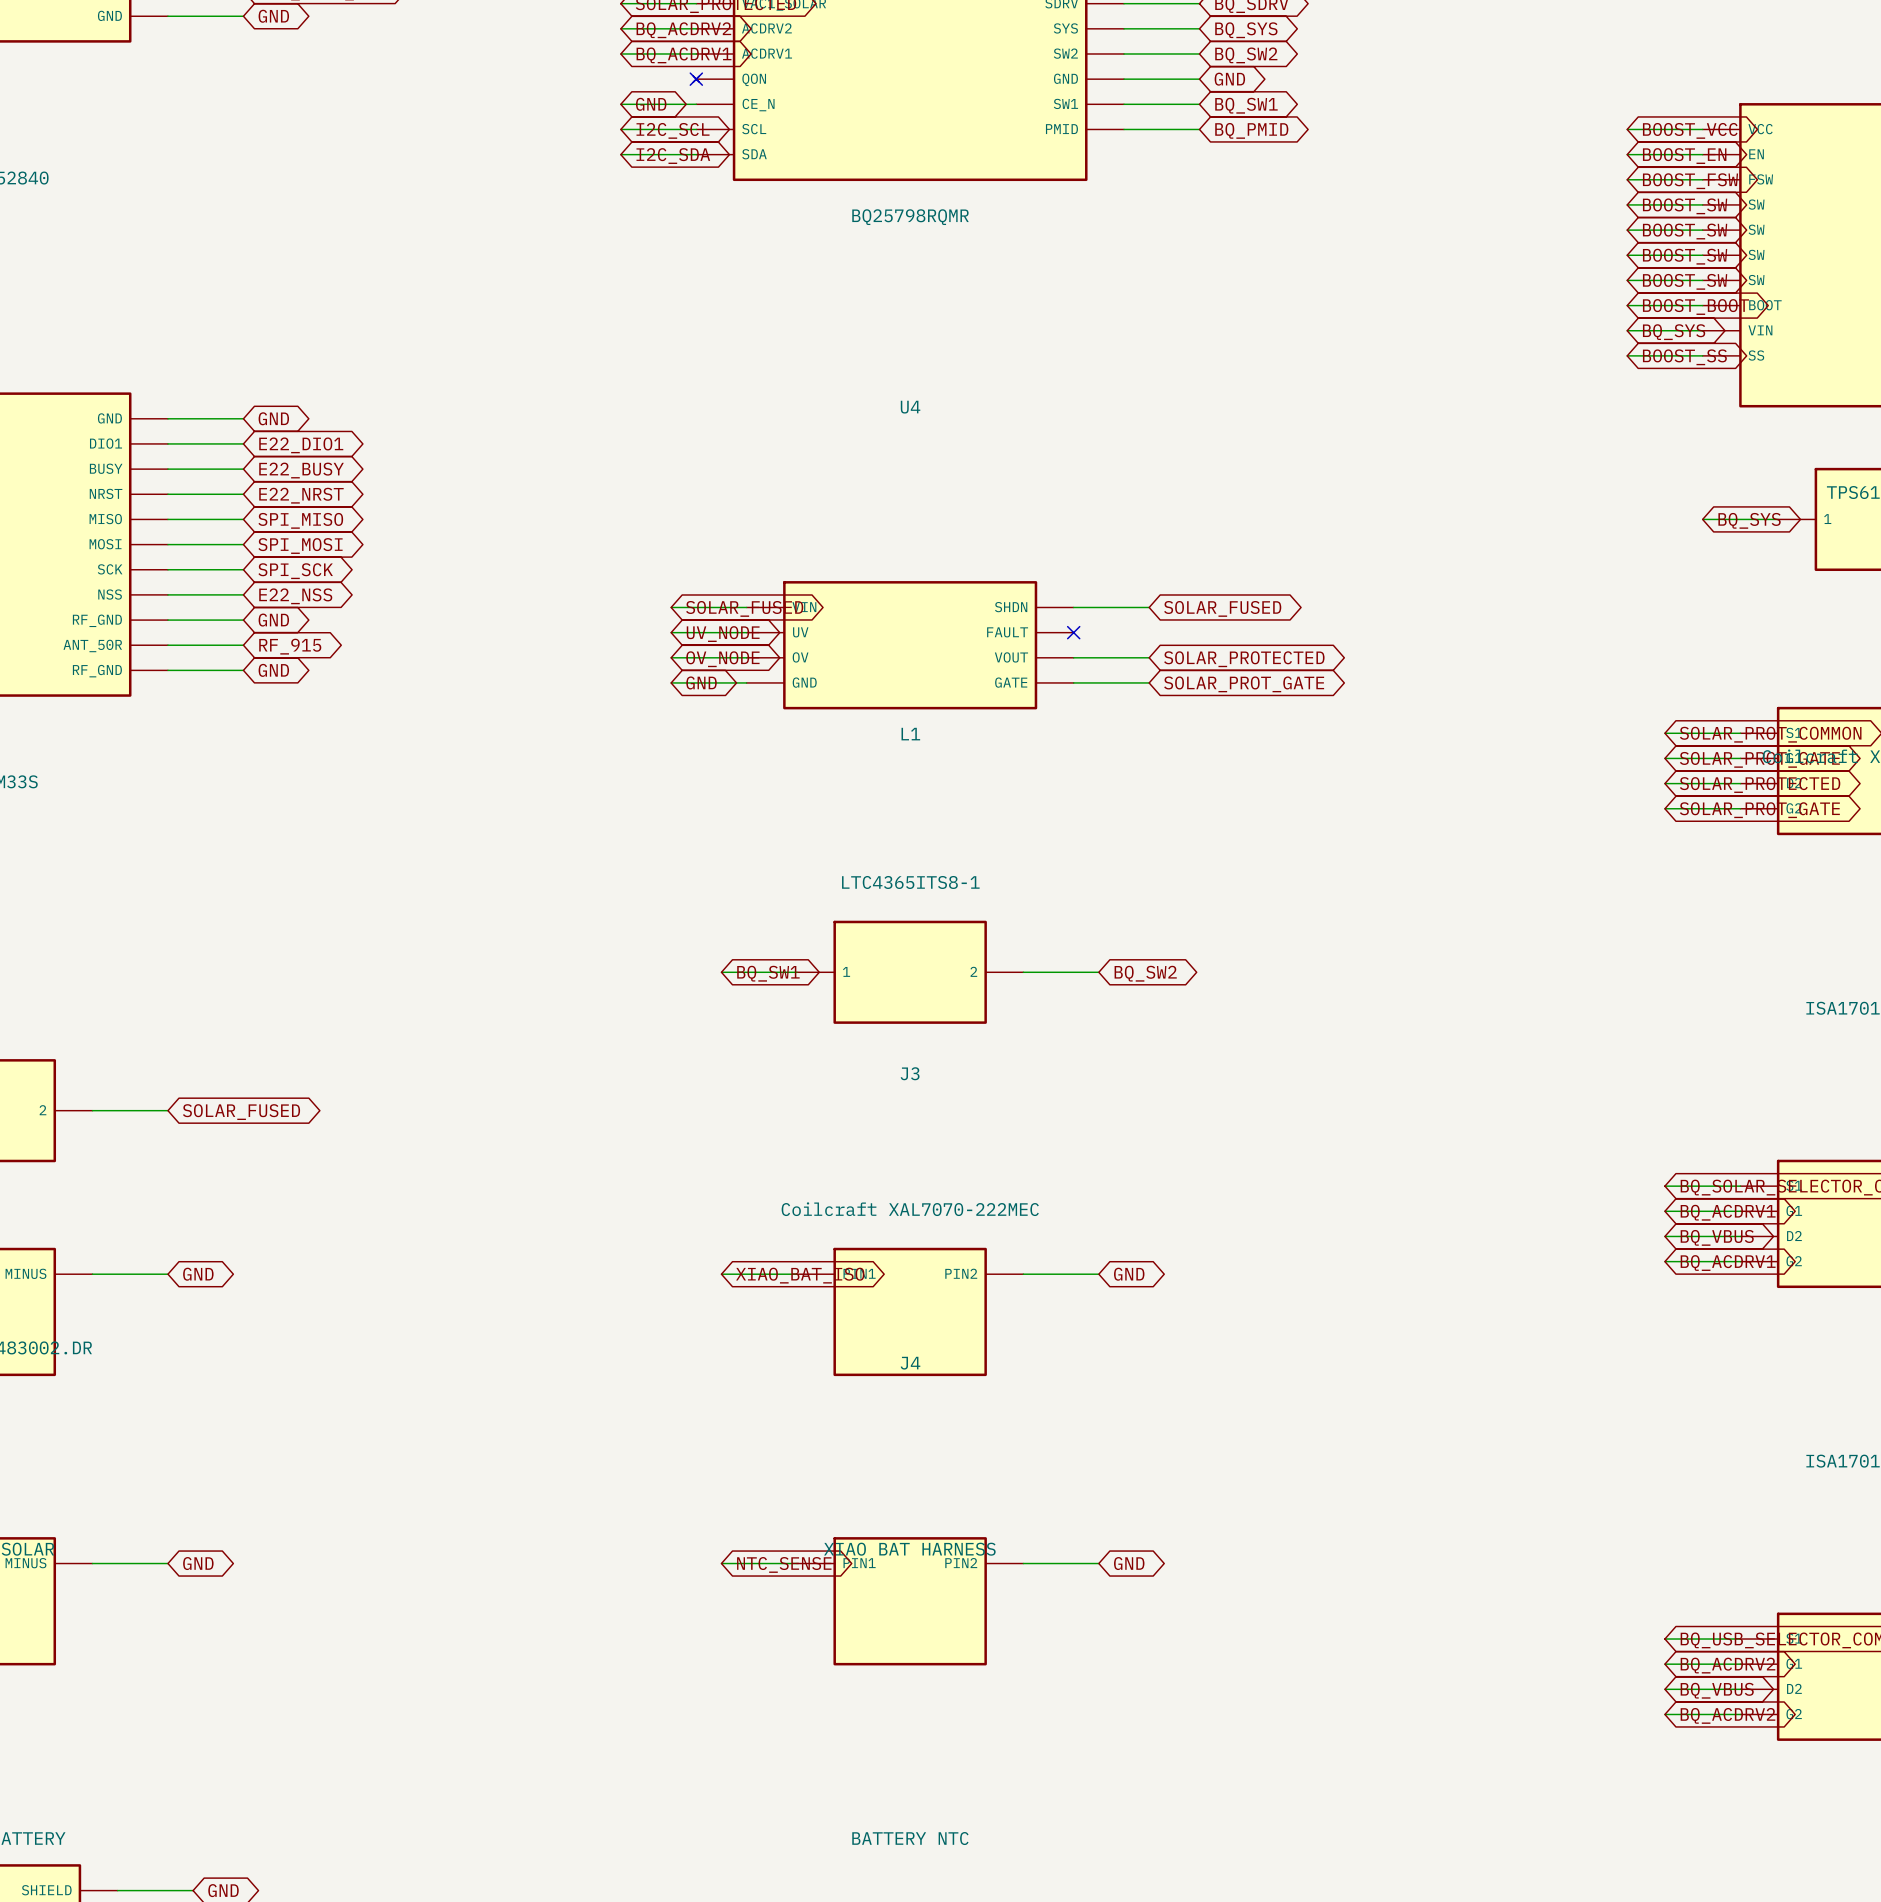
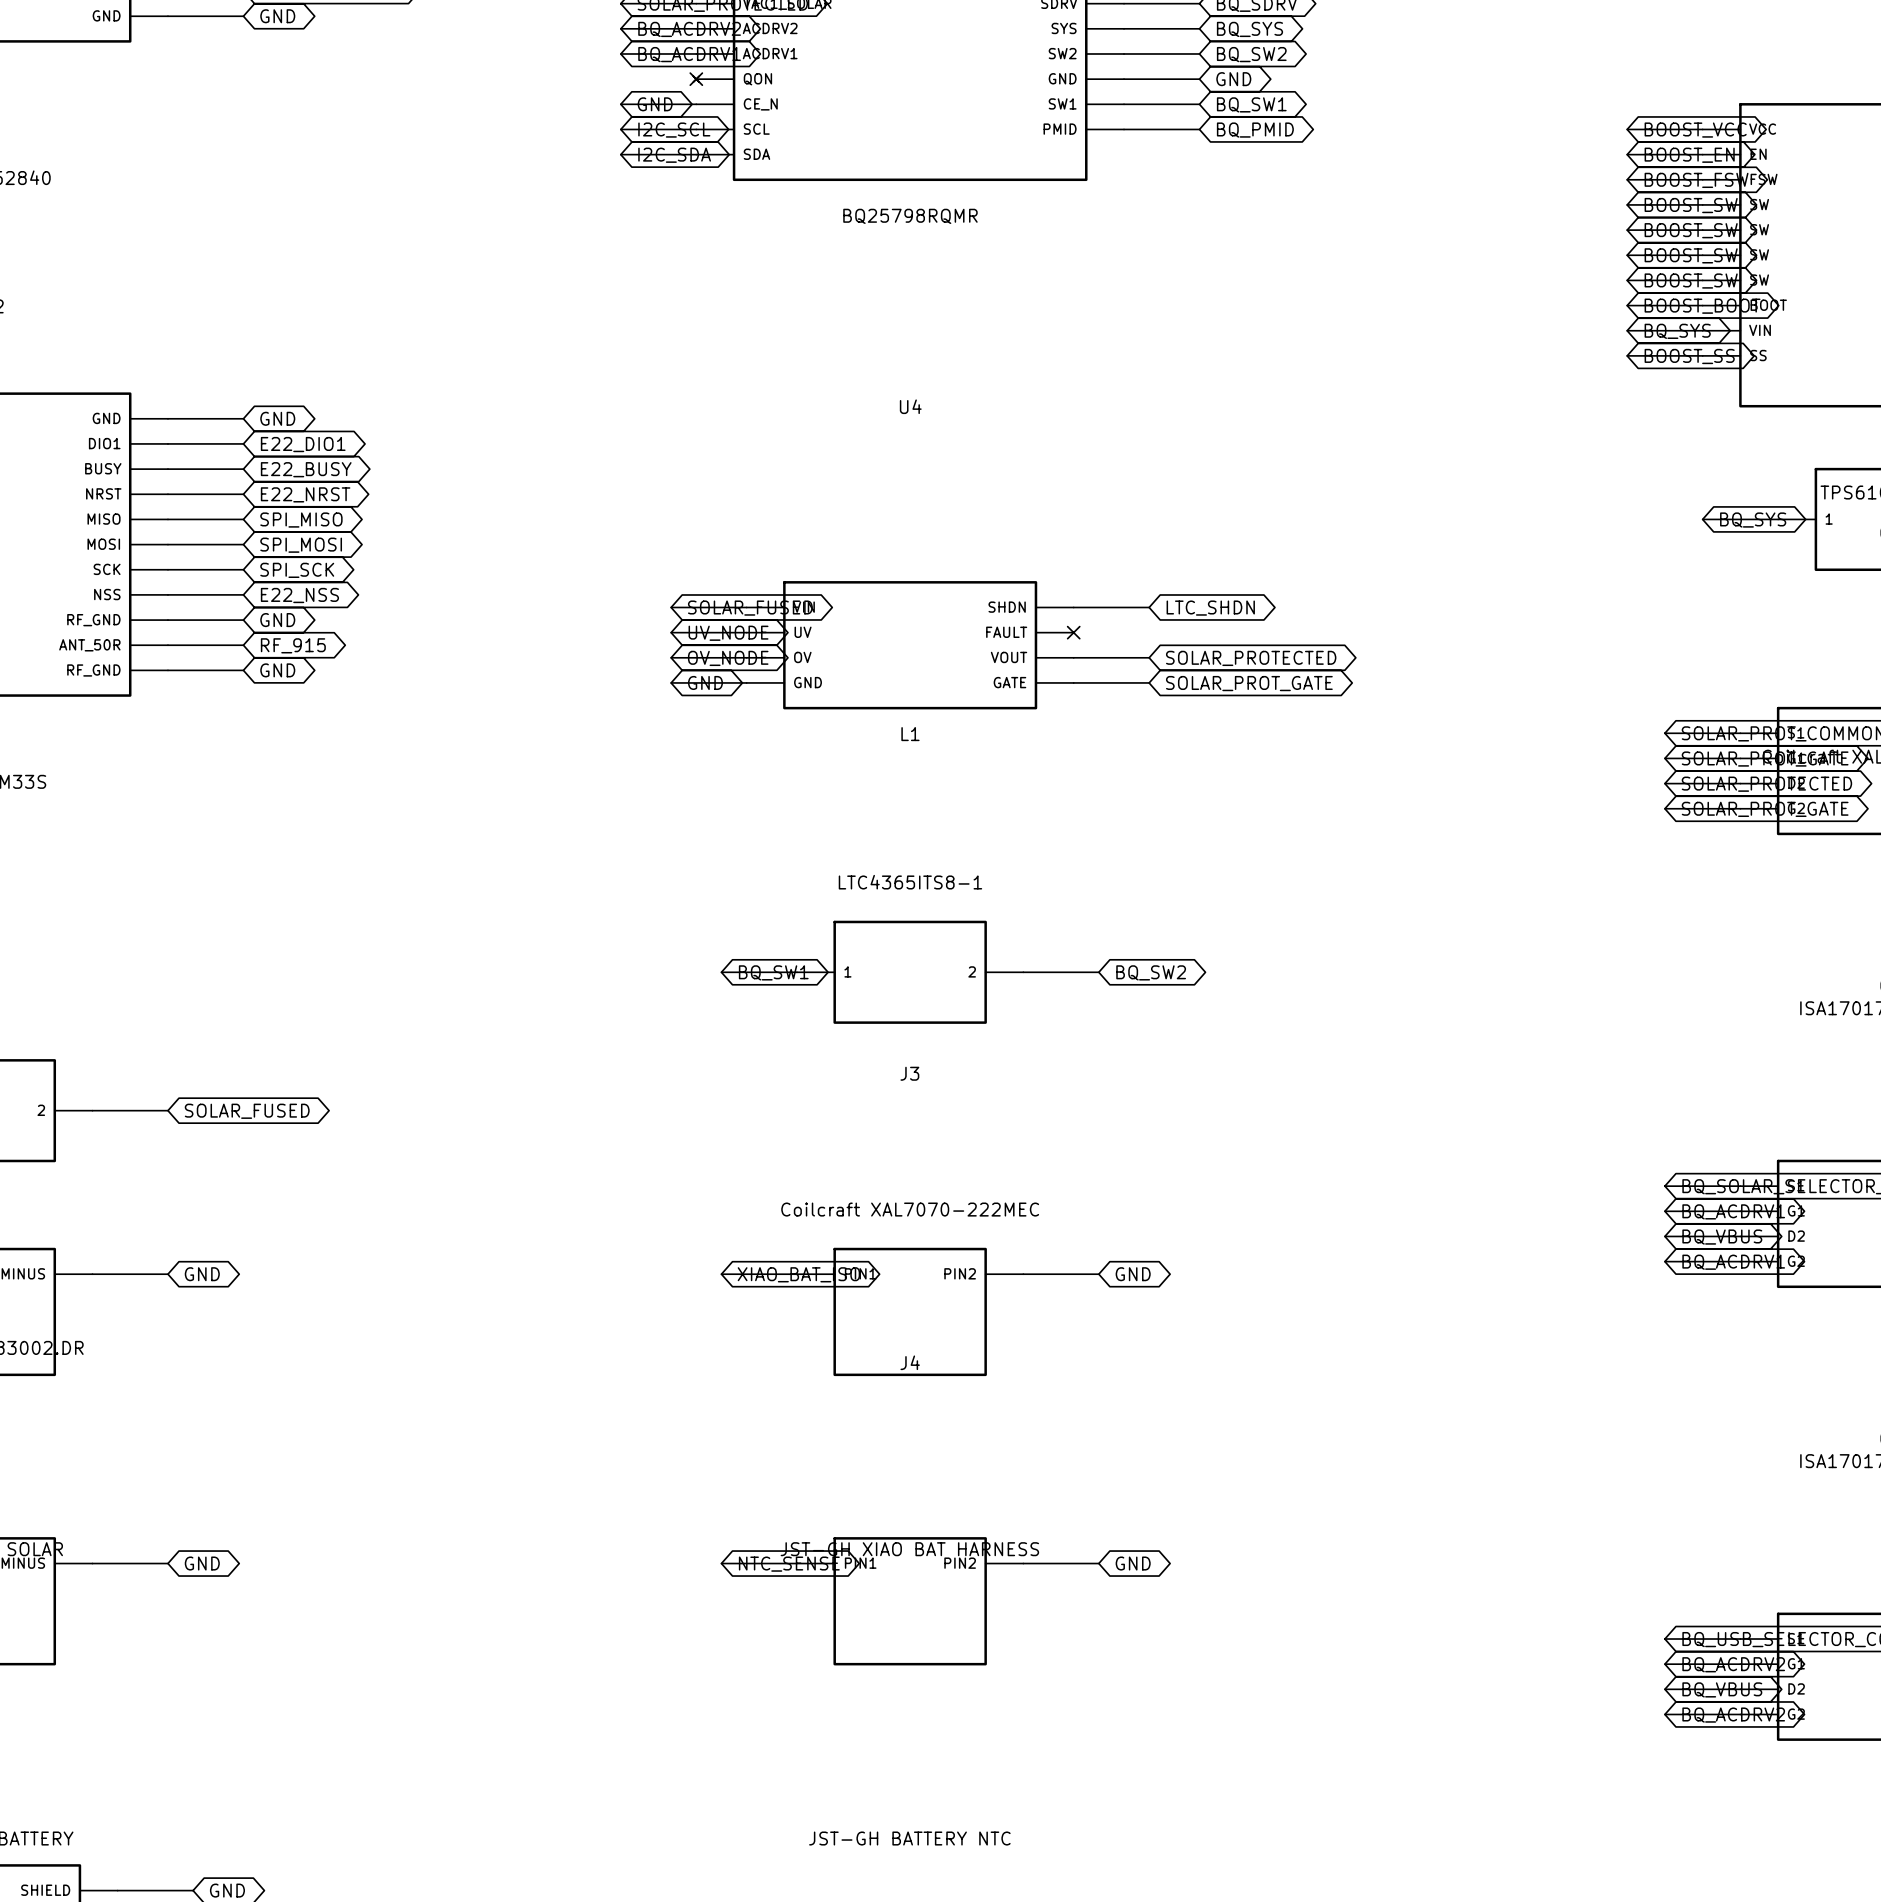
global label: SOLAR_FUSED (1222, 608) -> LTC_SHDN (1210, 608)
J3 value: XIAO BAT HARNESS (909, 1549) -> JST-GH XIAO BAT HARNESS (909, 1549)
J4 value: BATTERY NTC (910, 1838) -> JST-GH BATTERY NTC (909, 1838)

